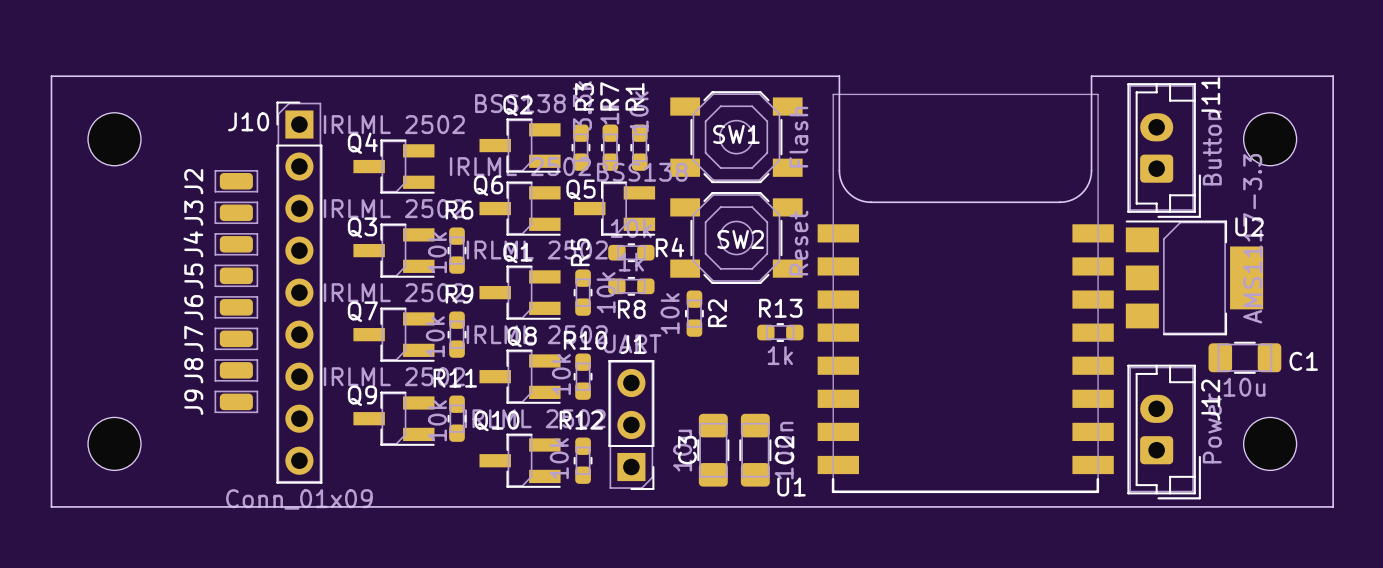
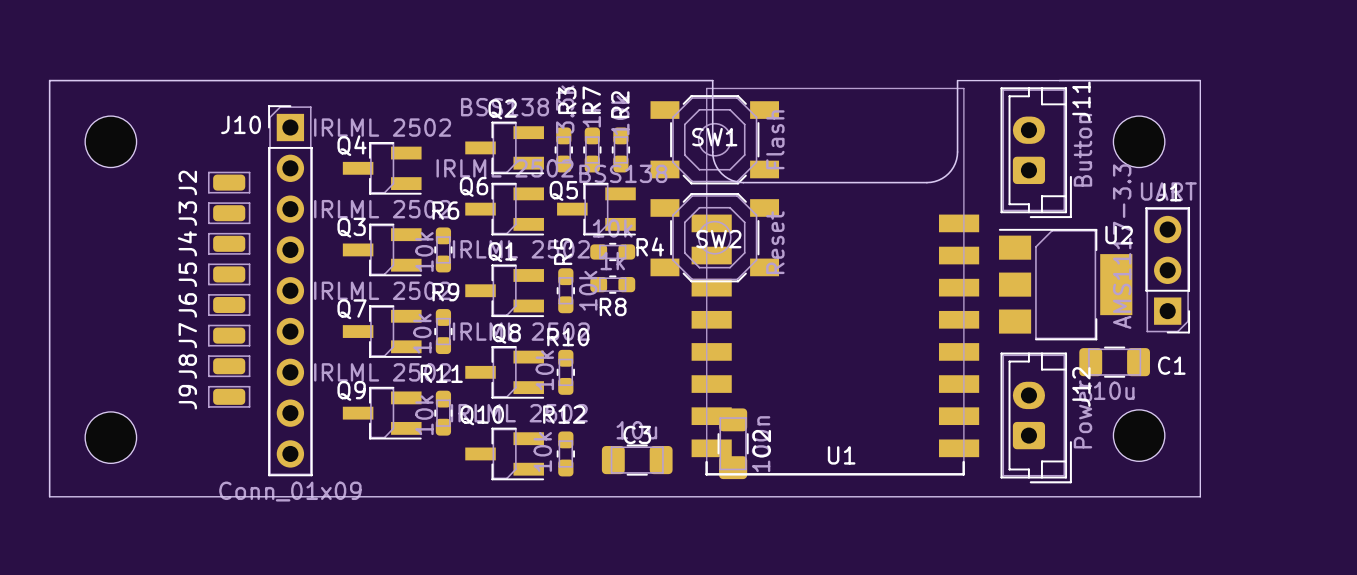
board edge: (734, 76) (839, 76) (840, 178) (843, 186) (851, 195) (862, 201) (870, 202) (1060, 202) (1075, 198) (1087, 186) (1091, 174) (1091, 76) -> (712, 80) (713, 159) (716, 167) (724, 176) (735, 181) (743, 182) (934, 181) (948, 173) (956, 159) (957, 80) (1059, 80)
board edge: (1236, 76) (1333, 76) (1333, 506) (51, 506) (51, 504) -> (1200, 80) (1200, 496) (49, 496)
R1 name: R1 (634, 96) -> R2 (620, 104)
part position: (1270, 139) -> (1139, 141)
J11 position: (1164, 150) -> (1036, 152)
U2 position: (1194, 277) -> (1065, 284)
U1 position: (965, 293) -> (835, 281)
R2: 10k (694, 313) -> none
R13: 1k (780, 332) -> none
C1 position: (1244, 357) -> (1114, 362)
J1 position: (631, 424) -> (1167, 270)
J12 position: (1164, 432) -> (1036, 417)
part position: (1270, 443) -> (1139, 435)
C3 rotation: 0° (713, 450) -> 90° clockwise (637, 460)
C3 position: (713, 450) -> (637, 460)
U1 name position: U1 (791, 486) -> U1 (841, 455)

